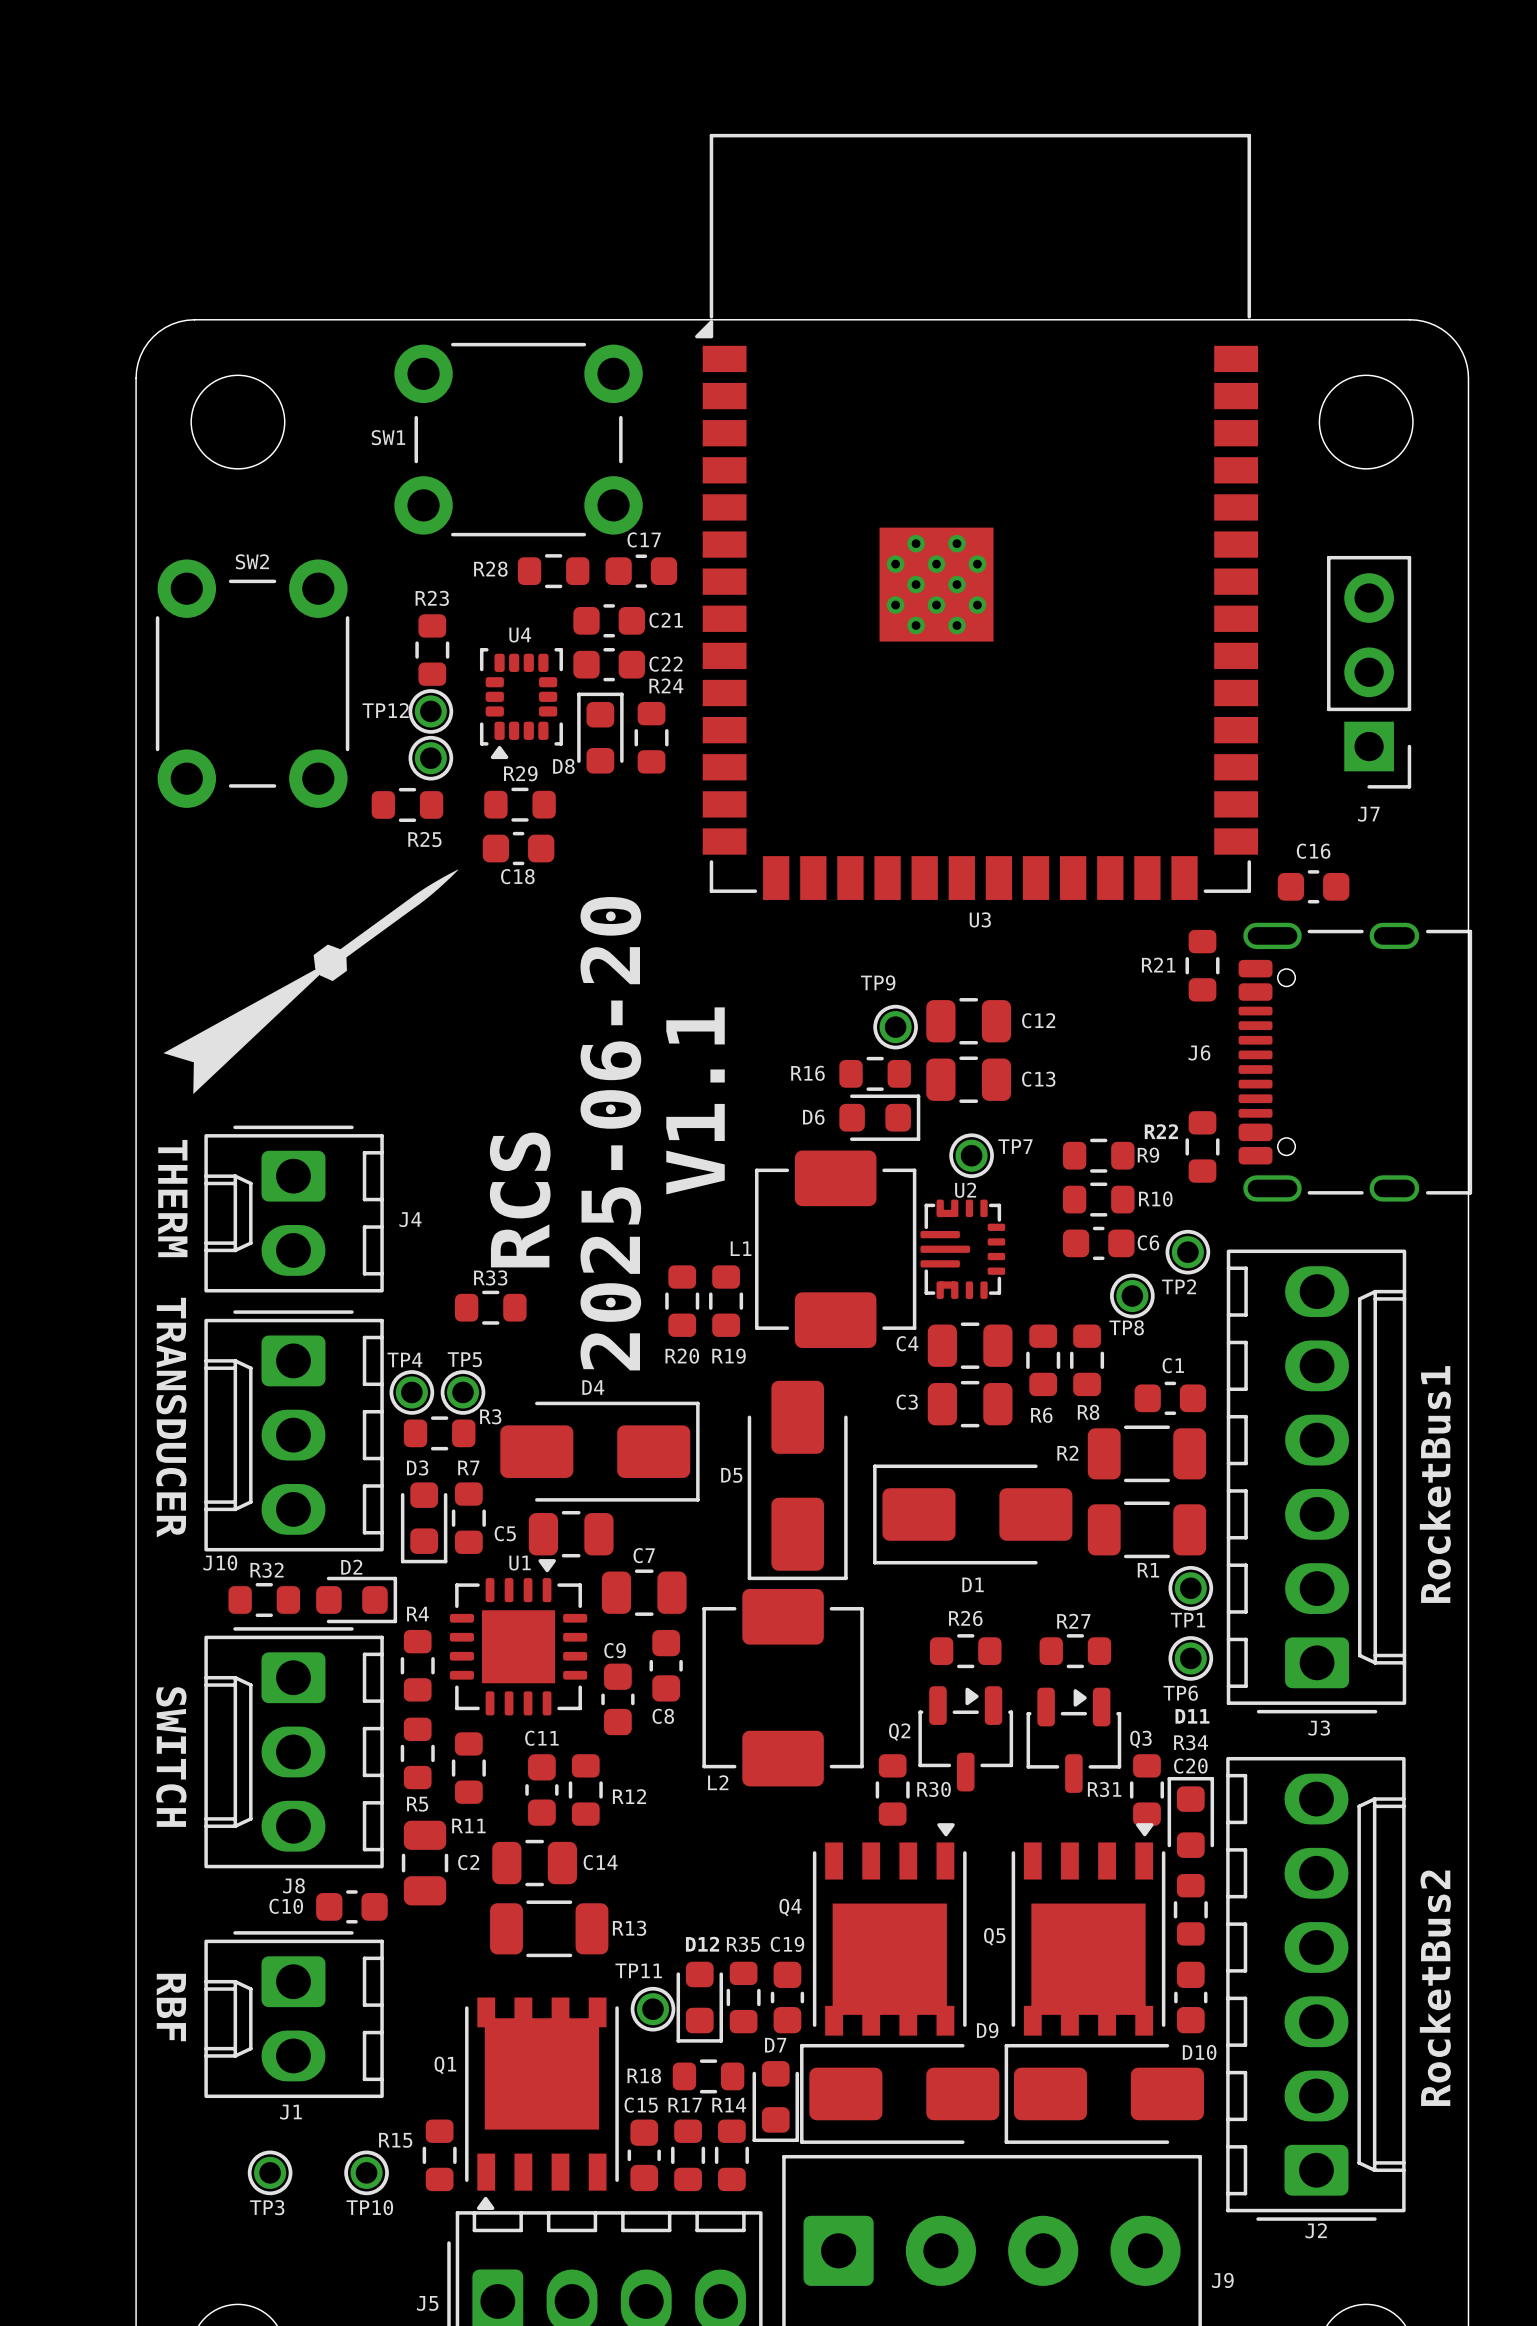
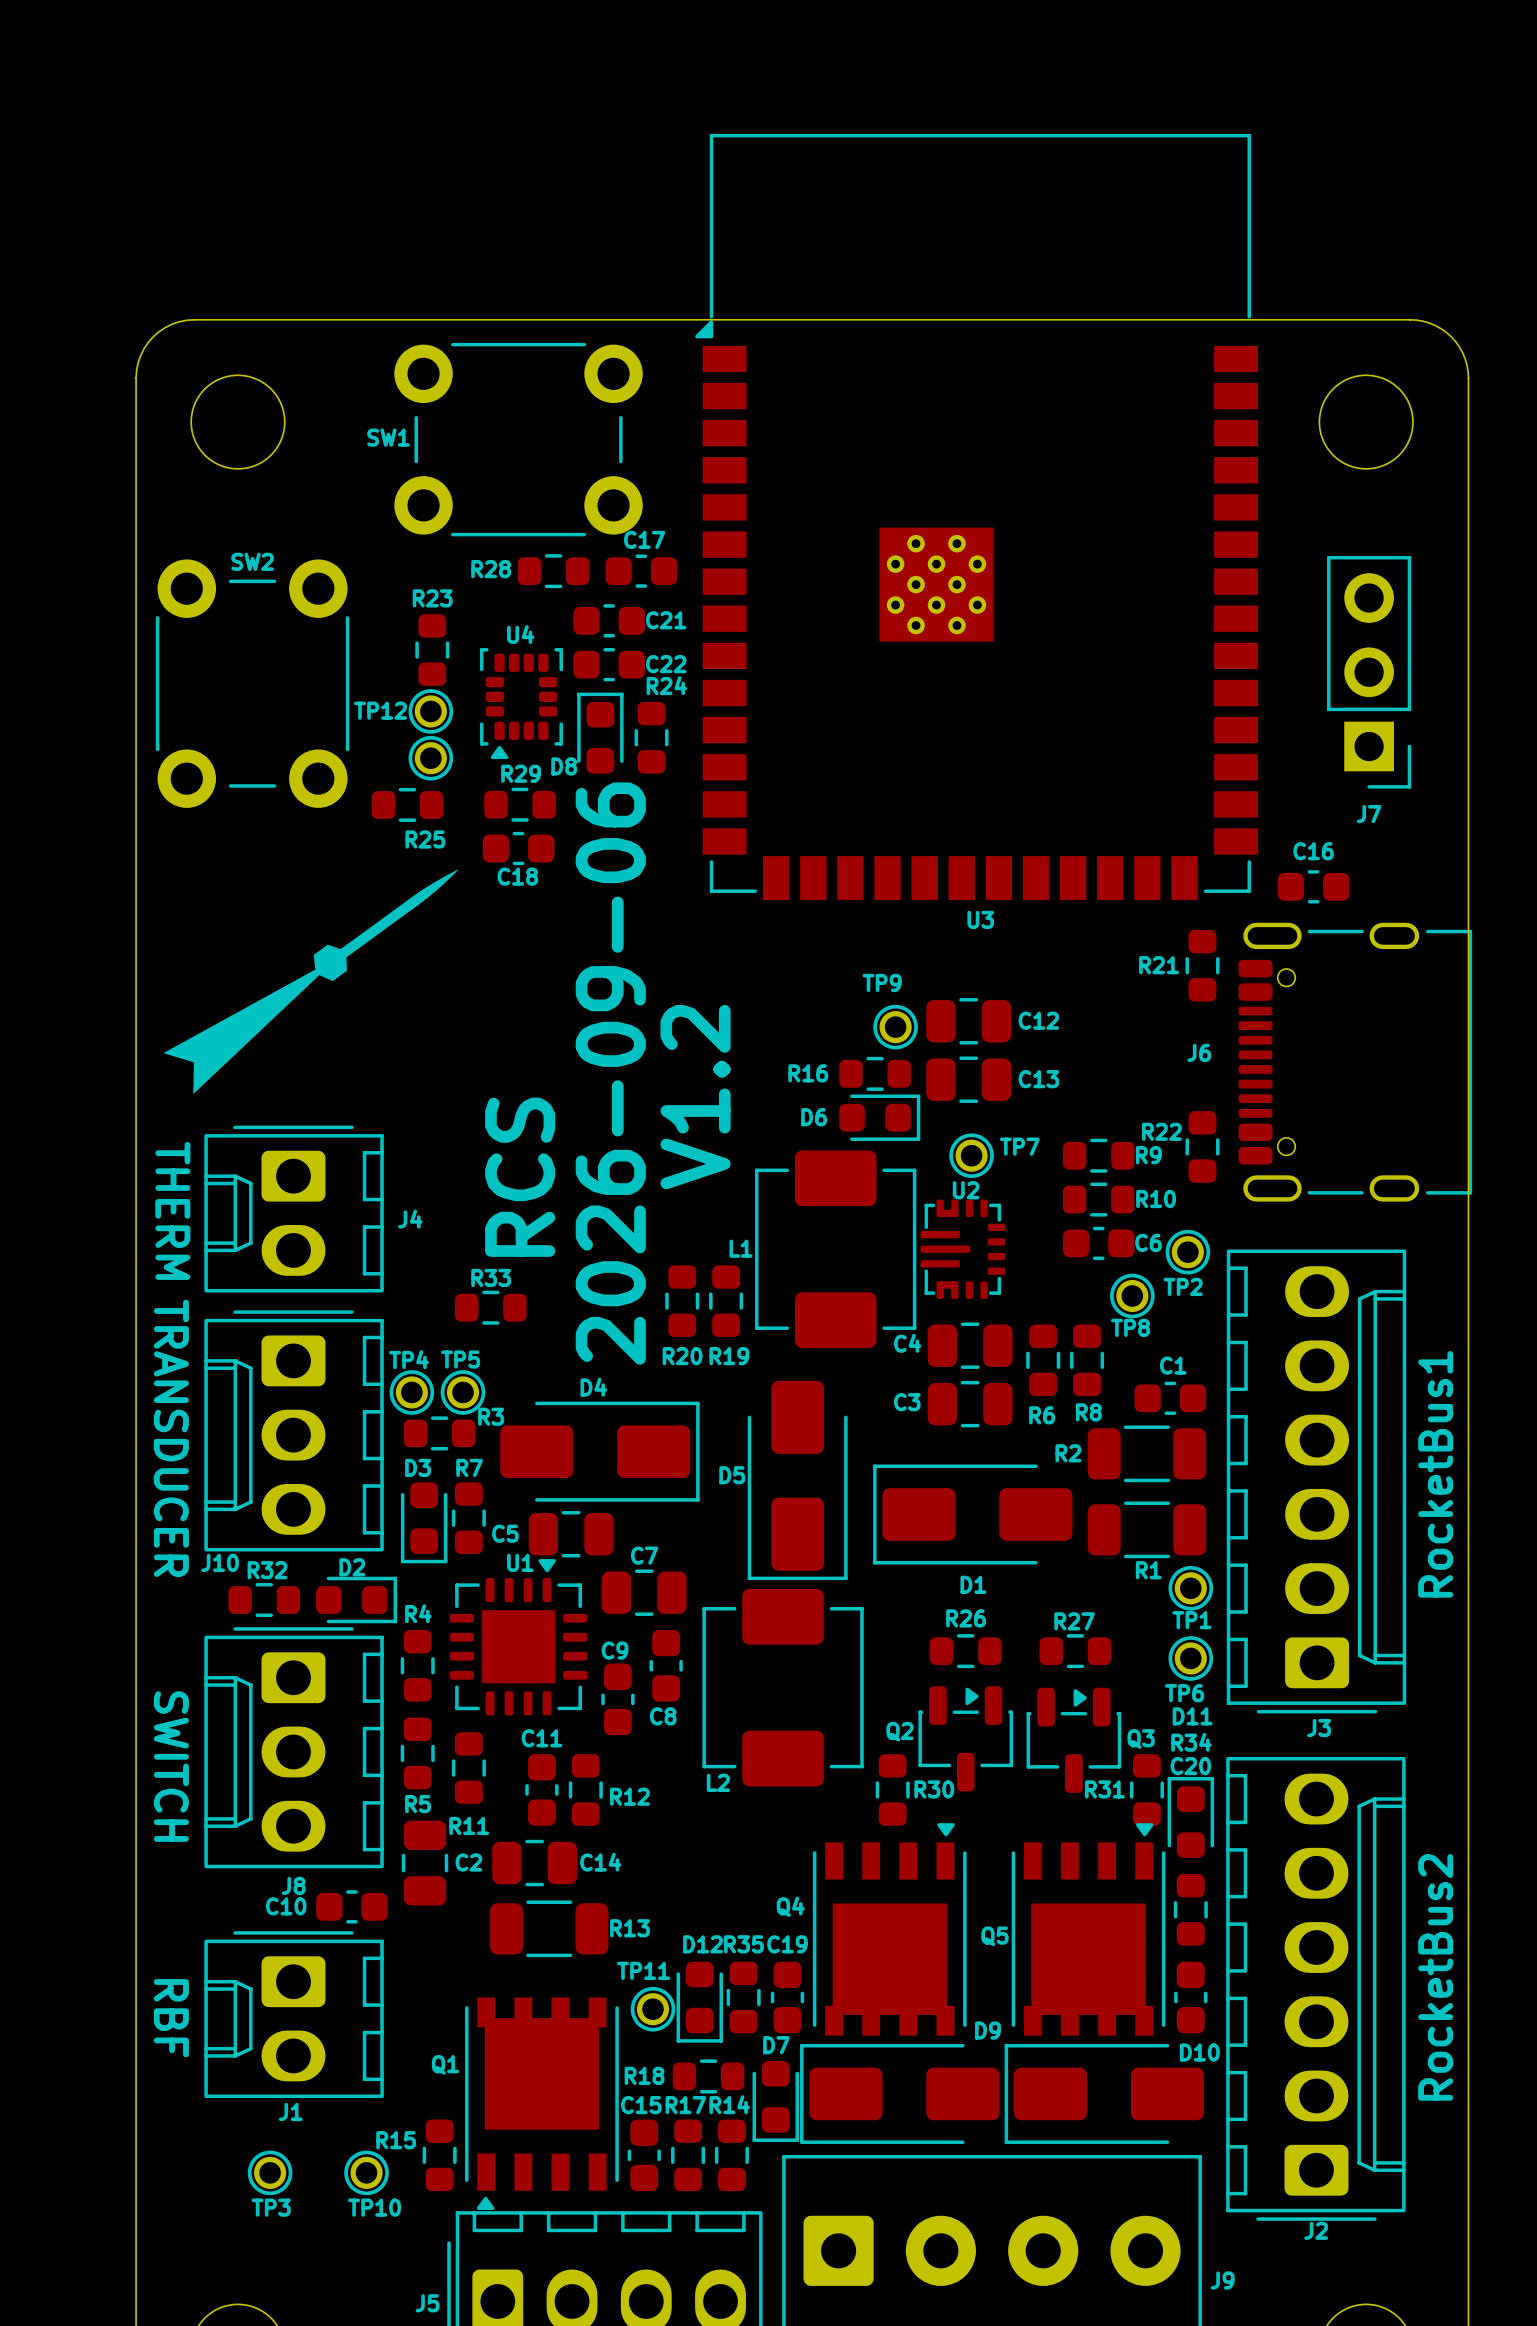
text: V1.1 (695, 1100) -> V1.2 (695, 1097)
text: 2025-06-20 (610, 1133) -> 2026-09-06 (610, 1073)

